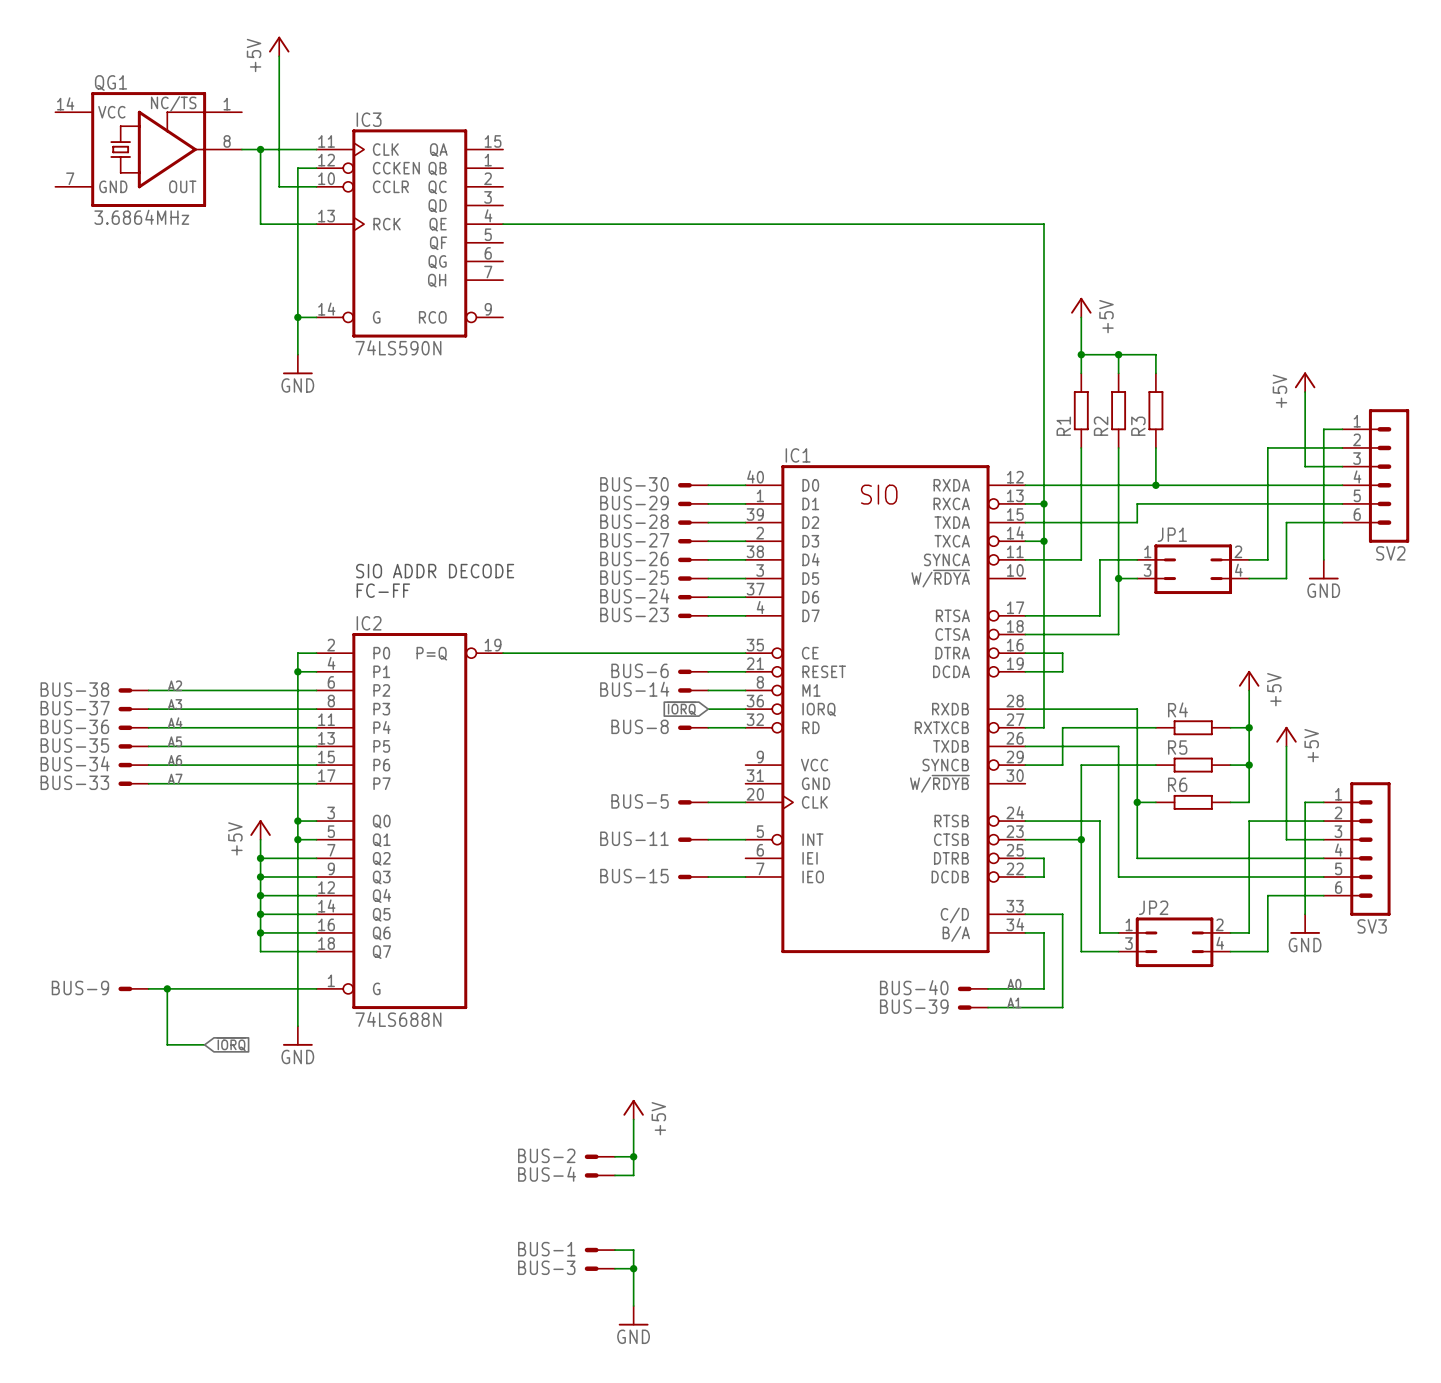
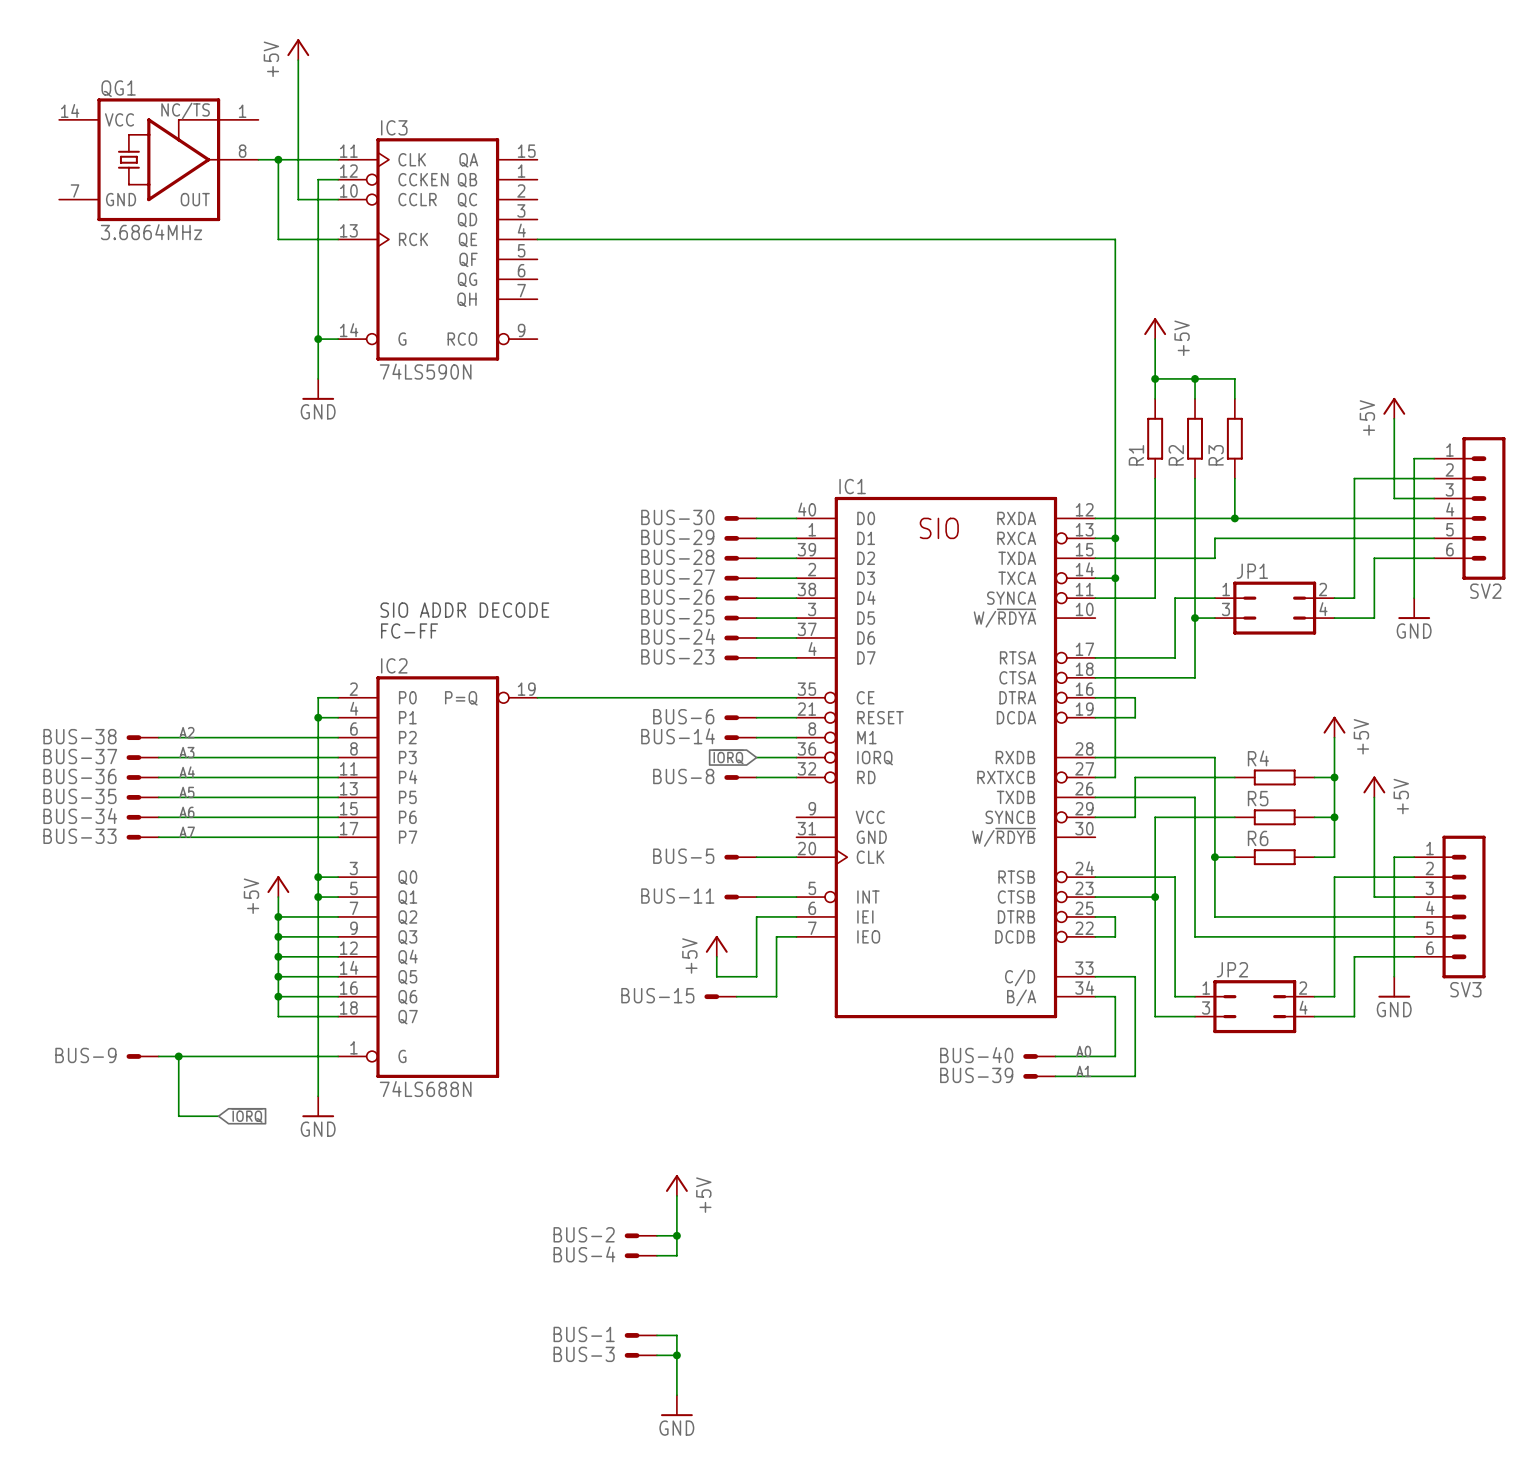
wire: none -> (796, 916) (756, 916) (756, 976) (716, 976) (716, 956)
BUS-15 position: (693, 876) -> (720, 996)
wire: (708, 876) (726, 876) -> (736, 996) (776, 996) (776, 936)
power symbol: none -> +5V (716, 946)

